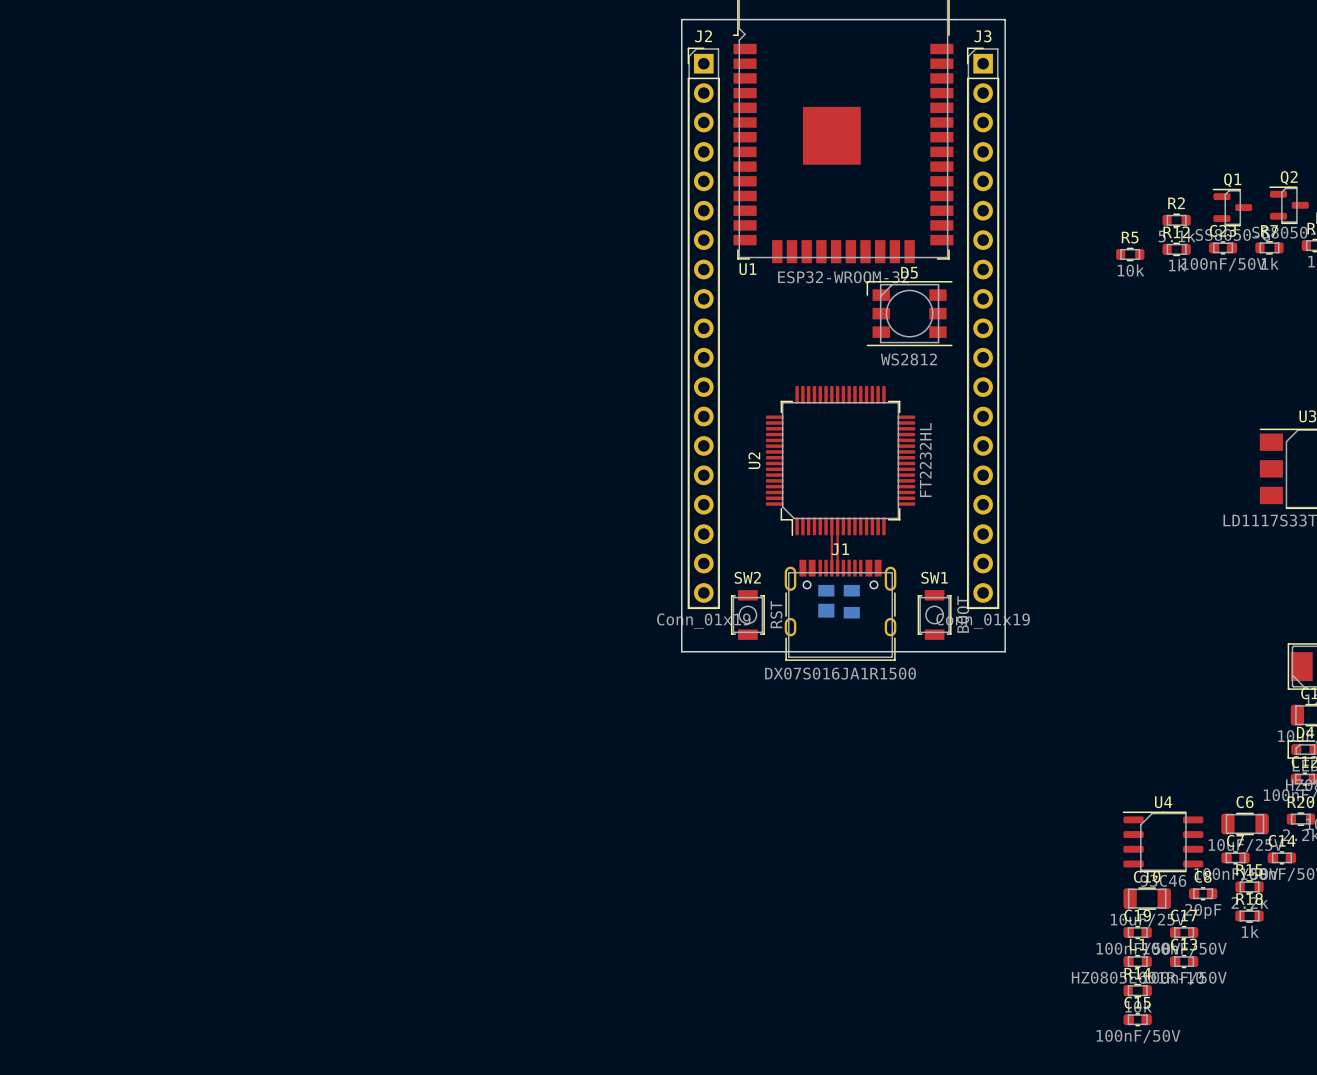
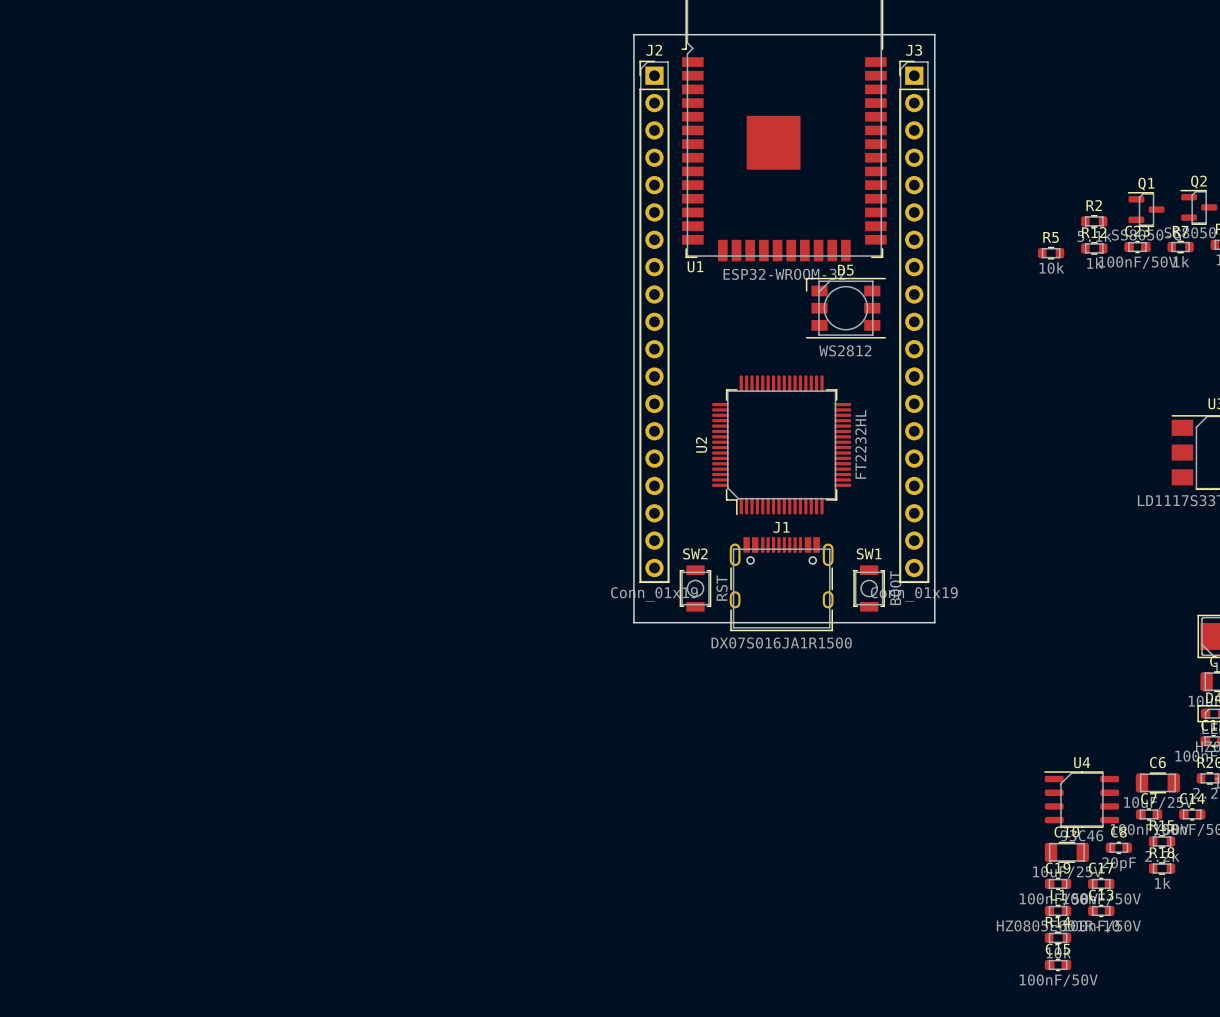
top track: (831, 526) (831, 568) -> none
top track: (837, 526) (837, 568) -> none
part: (839, 601) -> none

